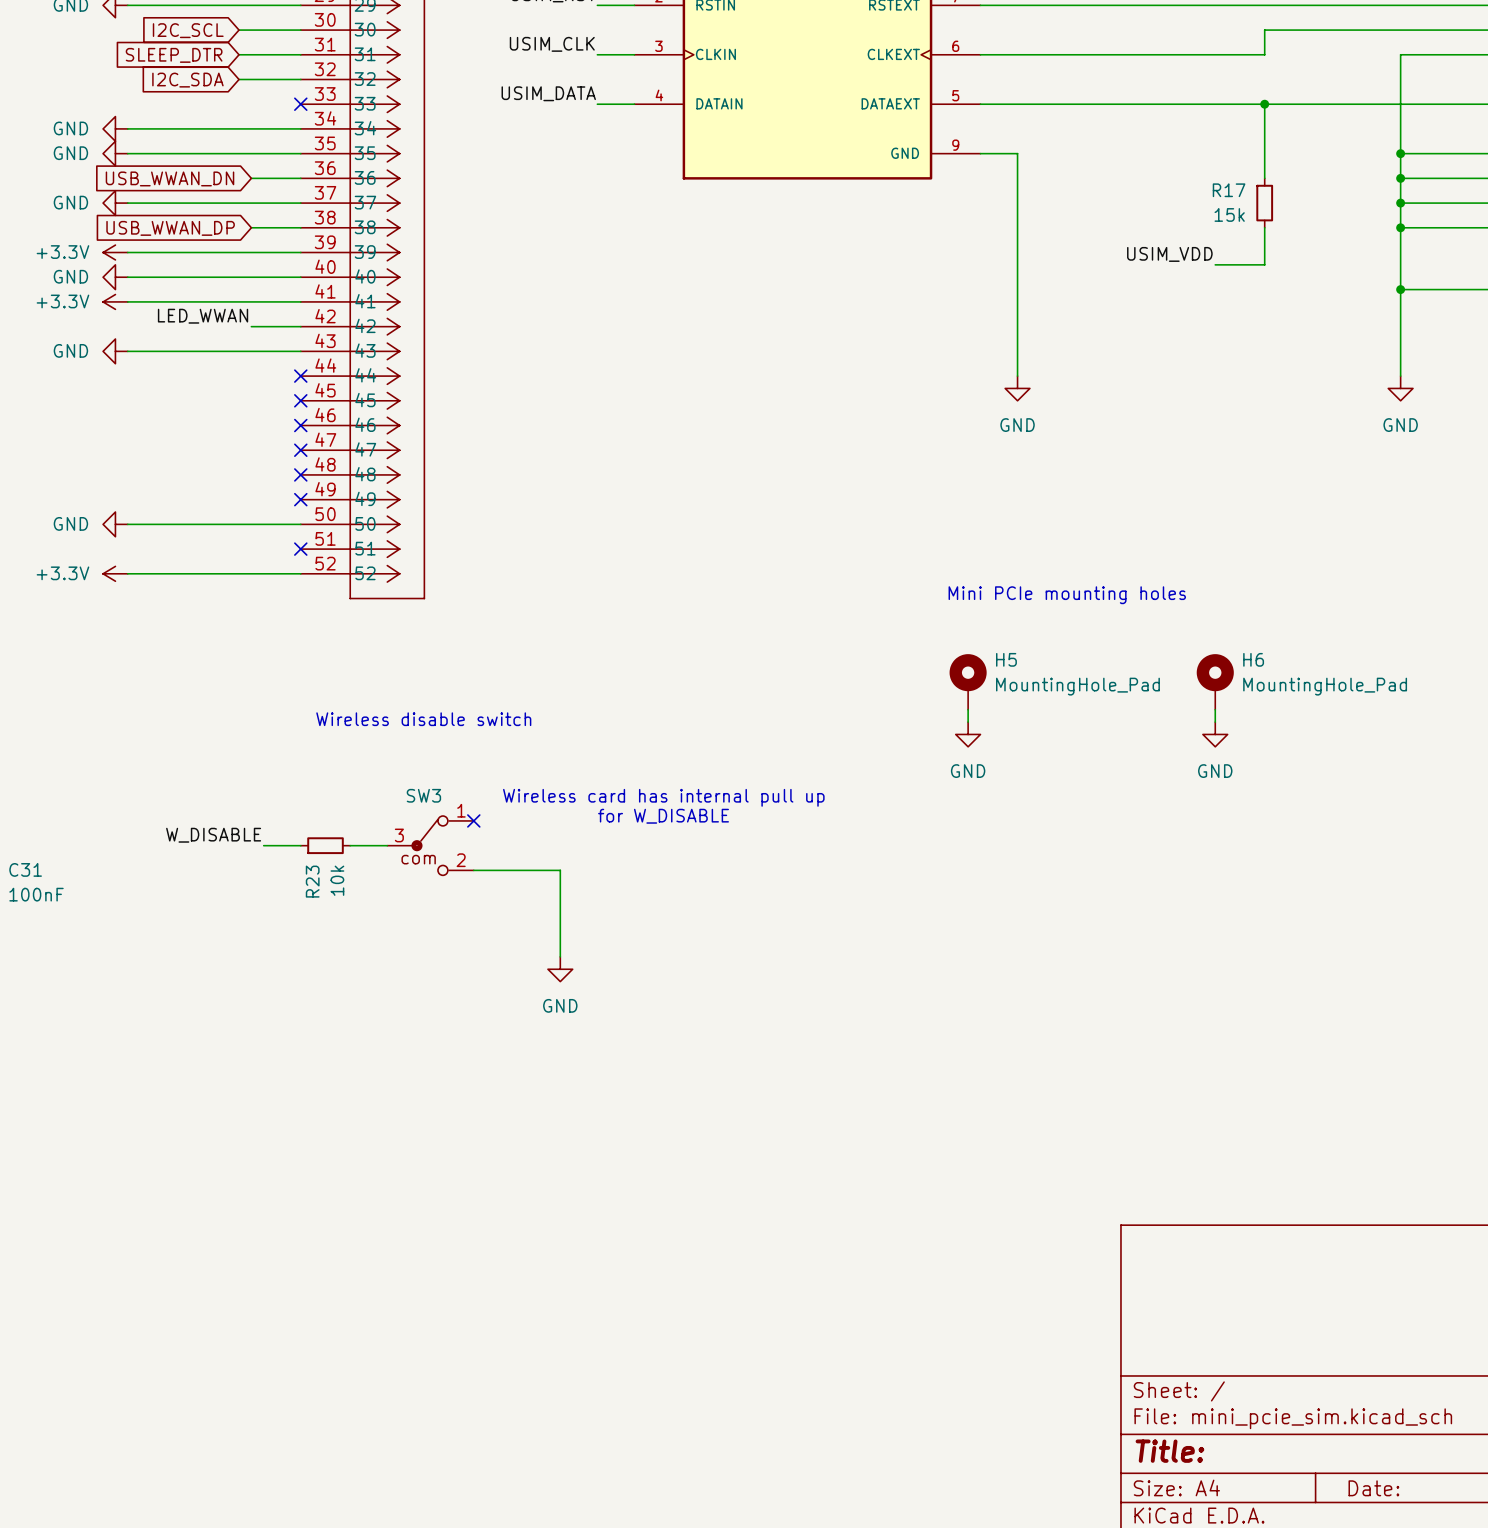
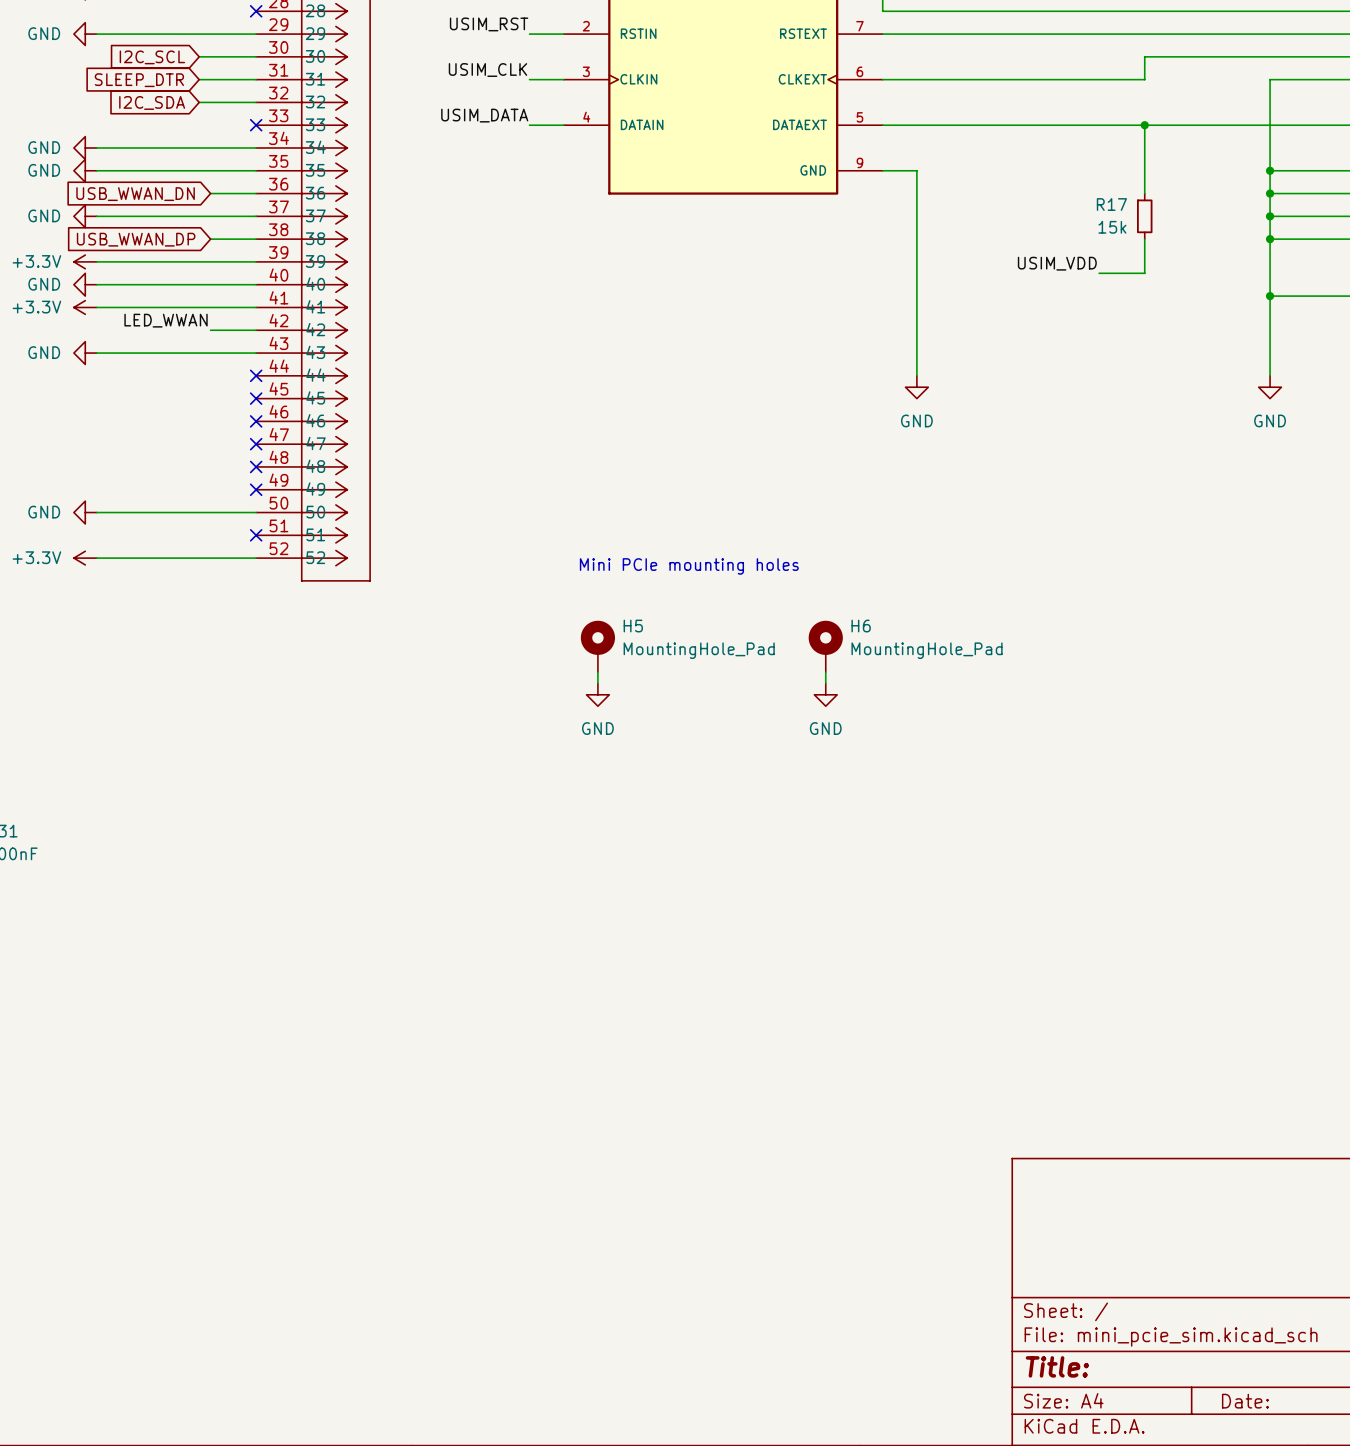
text: none -> Mini PCIe mounting holes (689, 566)
text: Mini PCIe mounting holes (1067, 595) -> none
H5 position: (968, 681) -> (597, 646)
H6 position: (1215, 681) -> (825, 646)
wire: none -> (597, 672) (597, 683)
wire: (968, 709) (968, 722) -> (825, 672) (825, 683)
wire: (1215, 709) (1215, 722) -> none
text: Wireless disable switch (423, 719) -> none
power symbol: none -> GND (597, 694)
power symbol position: GND (968, 734) -> GND (825, 694)
power symbol: GND (1215, 734) -> none
text: Wireless card has internal pull up (663, 797) -> none
text: for W_DISABLE (663, 816) -> none
no-connect mark: (473, 820) -> none
label: W_DISABLE (213, 835) -> none
wire: (263, 845) (300, 845) -> none
R23: 10k (325, 845) -> none
wire: (350, 845) (387, 845) -> none
SW3: (430, 845) -> none
wire: (473, 870) (560, 870) (560, 956) -> none
power symbol: GND (560, 969) -> none

